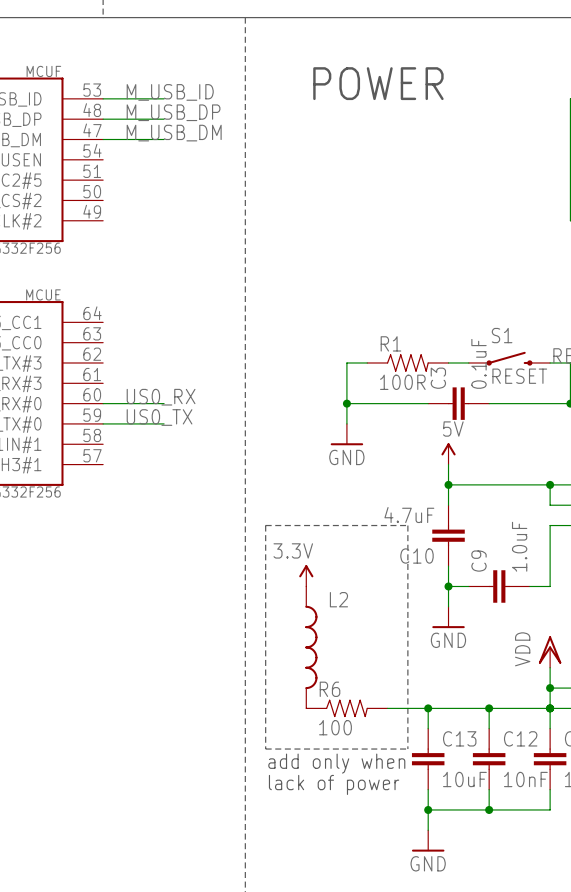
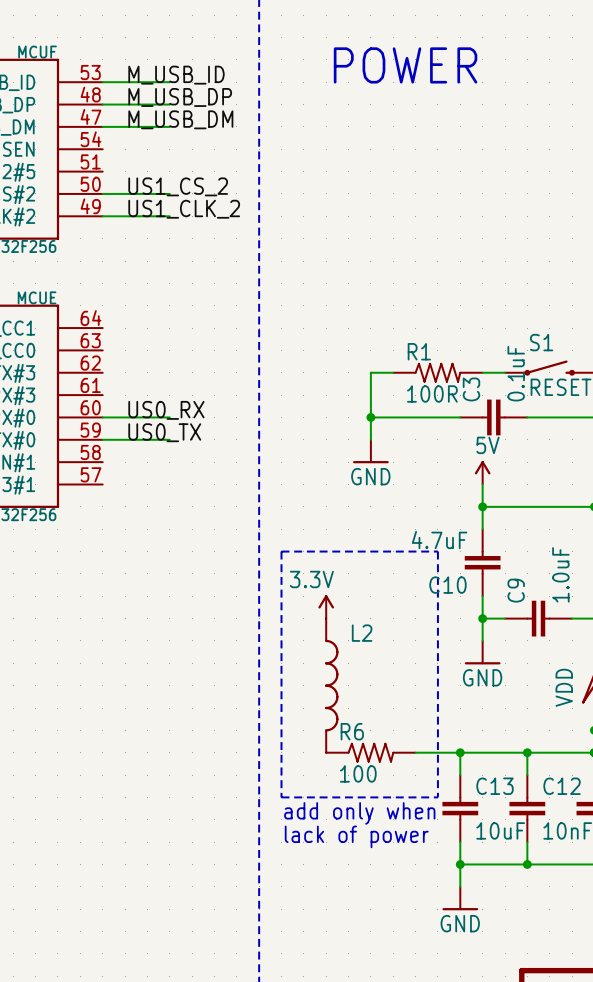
label: none -> US1_CS_2 (178, 186)
wire: none -> (102, 193) (169, 193)
label: none -> US1_CLK_2 (184, 209)
wire: none -> (102, 216) (169, 216)

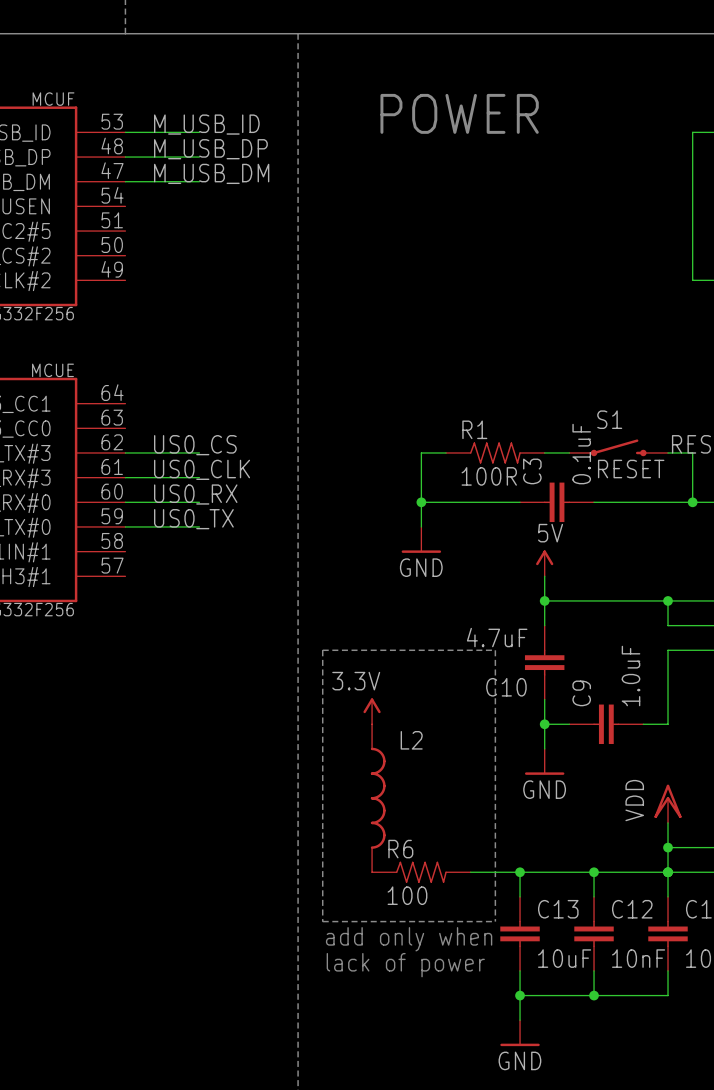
label: US1_CS_2 (178, 186) -> none
wire: (102, 193) (169, 193) -> (125, 477) (199, 477)
label: US1_CLK_2 (184, 209) -> none
wire: (102, 216) (169, 216) -> (125, 452) (199, 452)
label: none -> US0_CS (195, 445)
label: none -> US0_CLK (202, 469)

